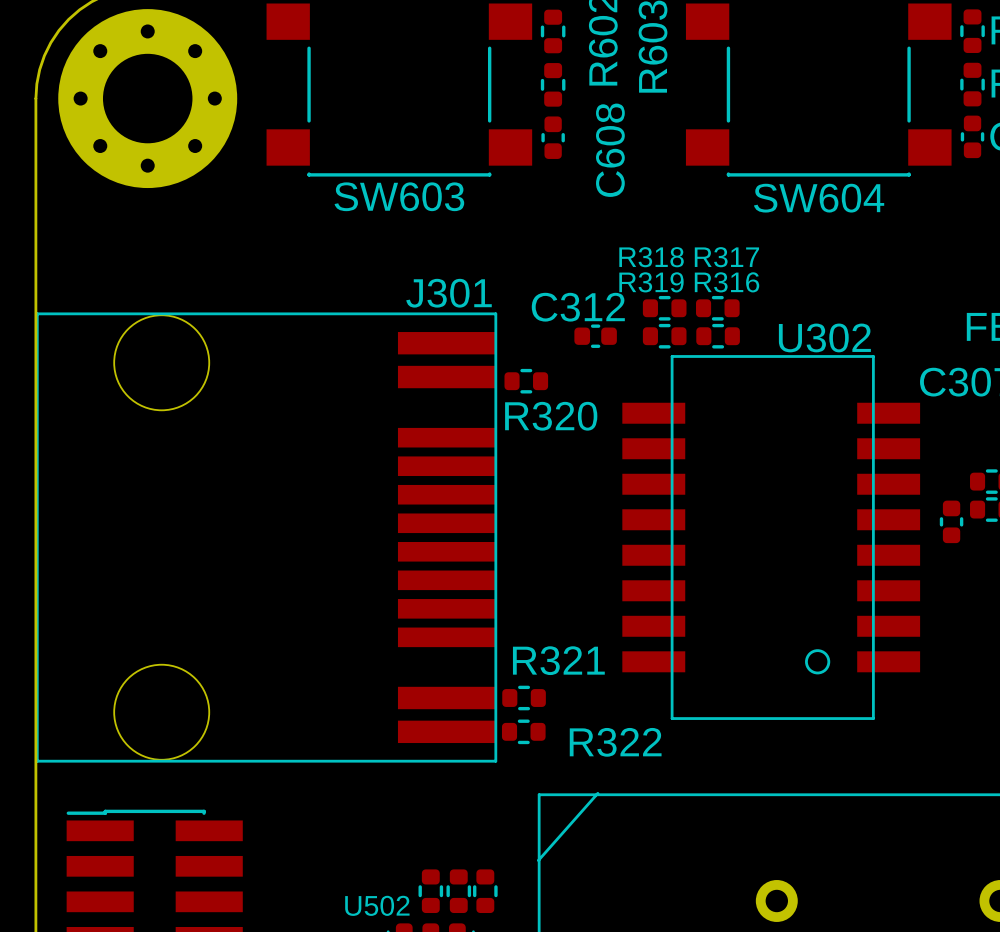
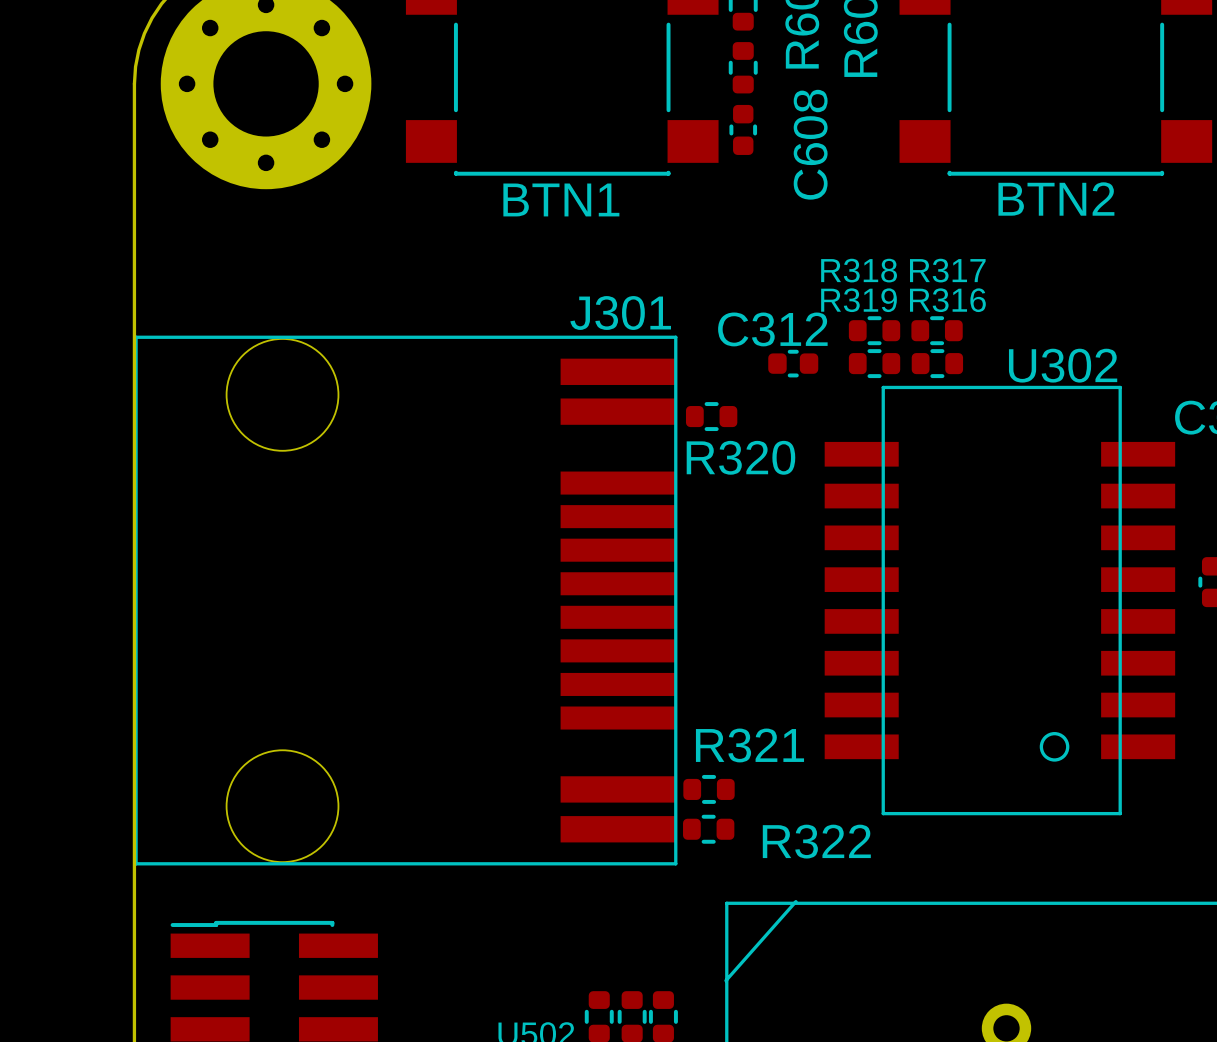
SW603 name: SW603 (399, 196) -> none
text: none -> BTN2 (1056, 199)
text: none -> BTN1 (561, 199)
SW604 name: SW604 (819, 198) -> none

